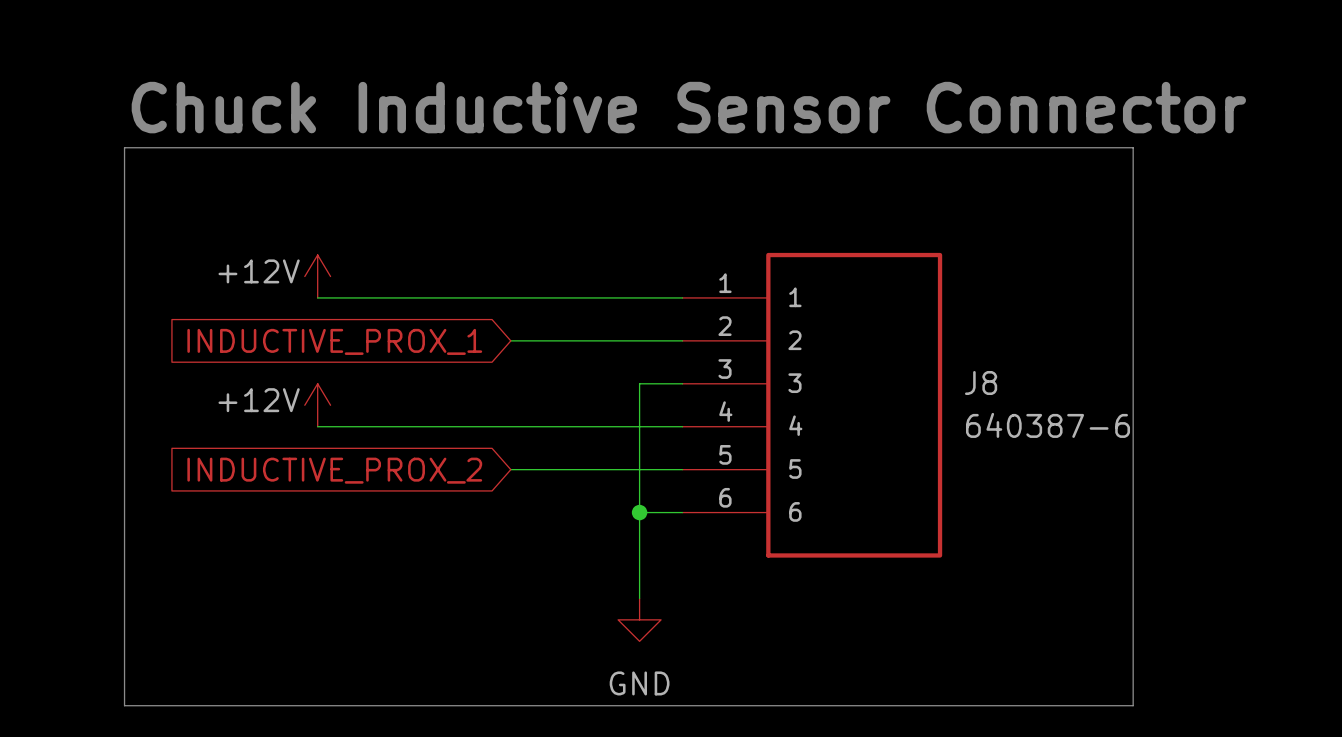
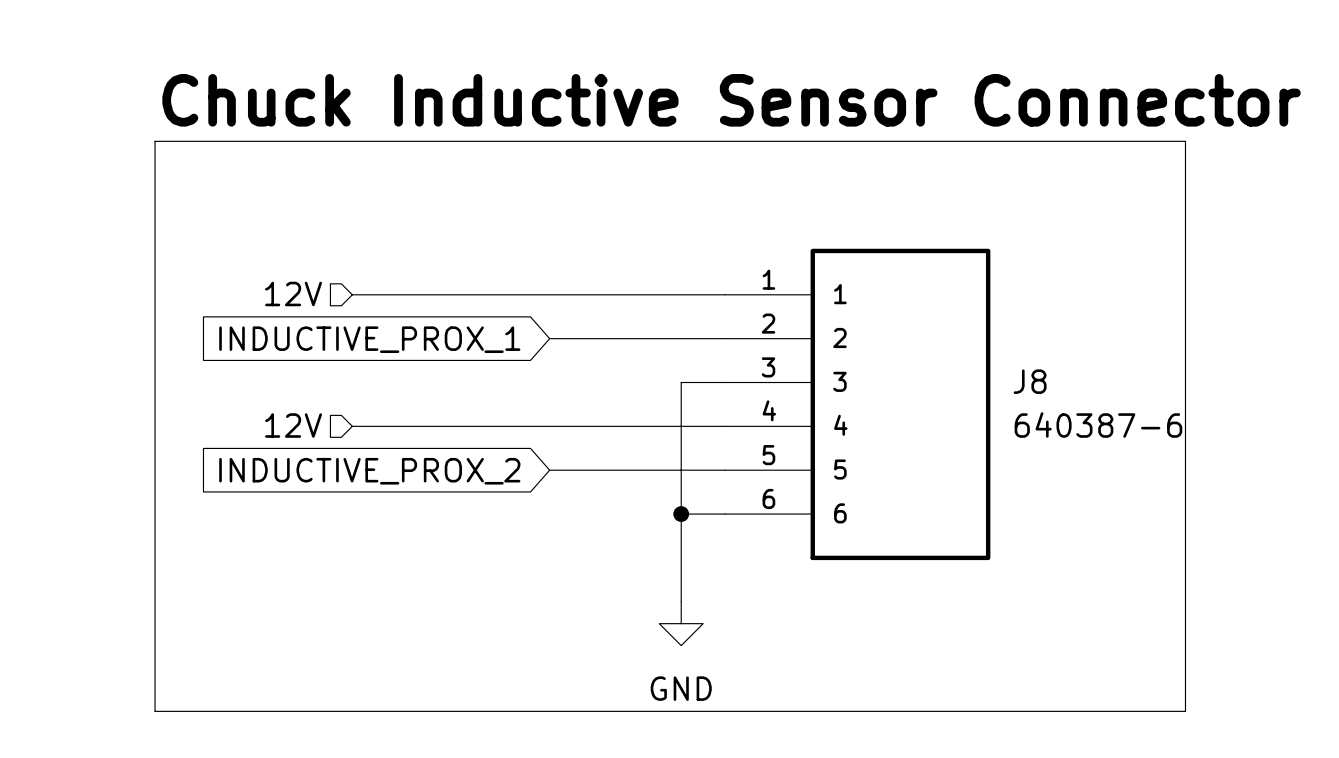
power symbol: +12V (317, 276) -> none
hierarchical label: none -> 12V (293, 293)
power symbol: +12V (317, 405) -> none
hierarchical label: none -> 12V (293, 425)

